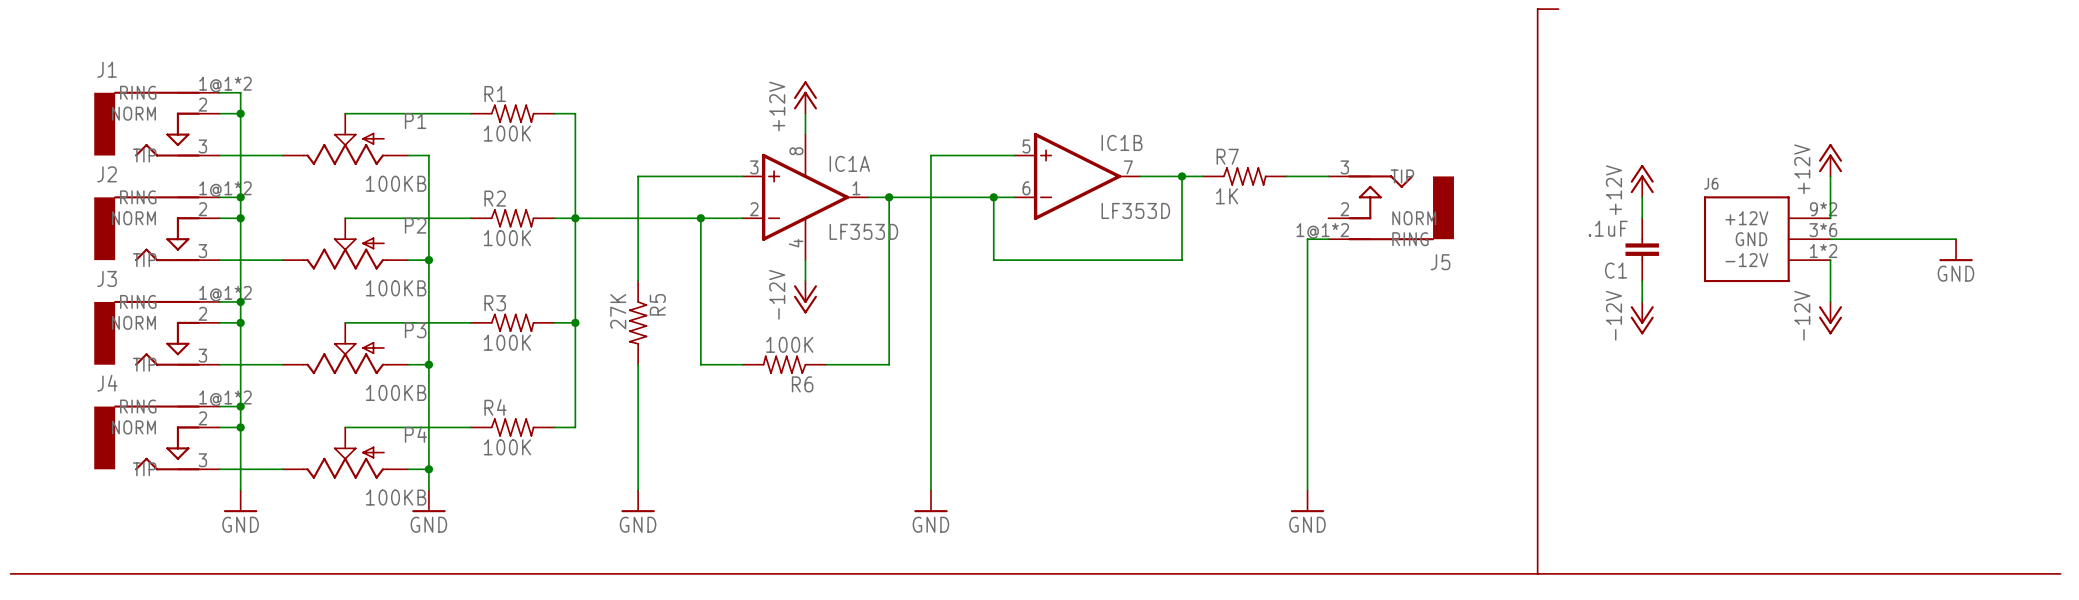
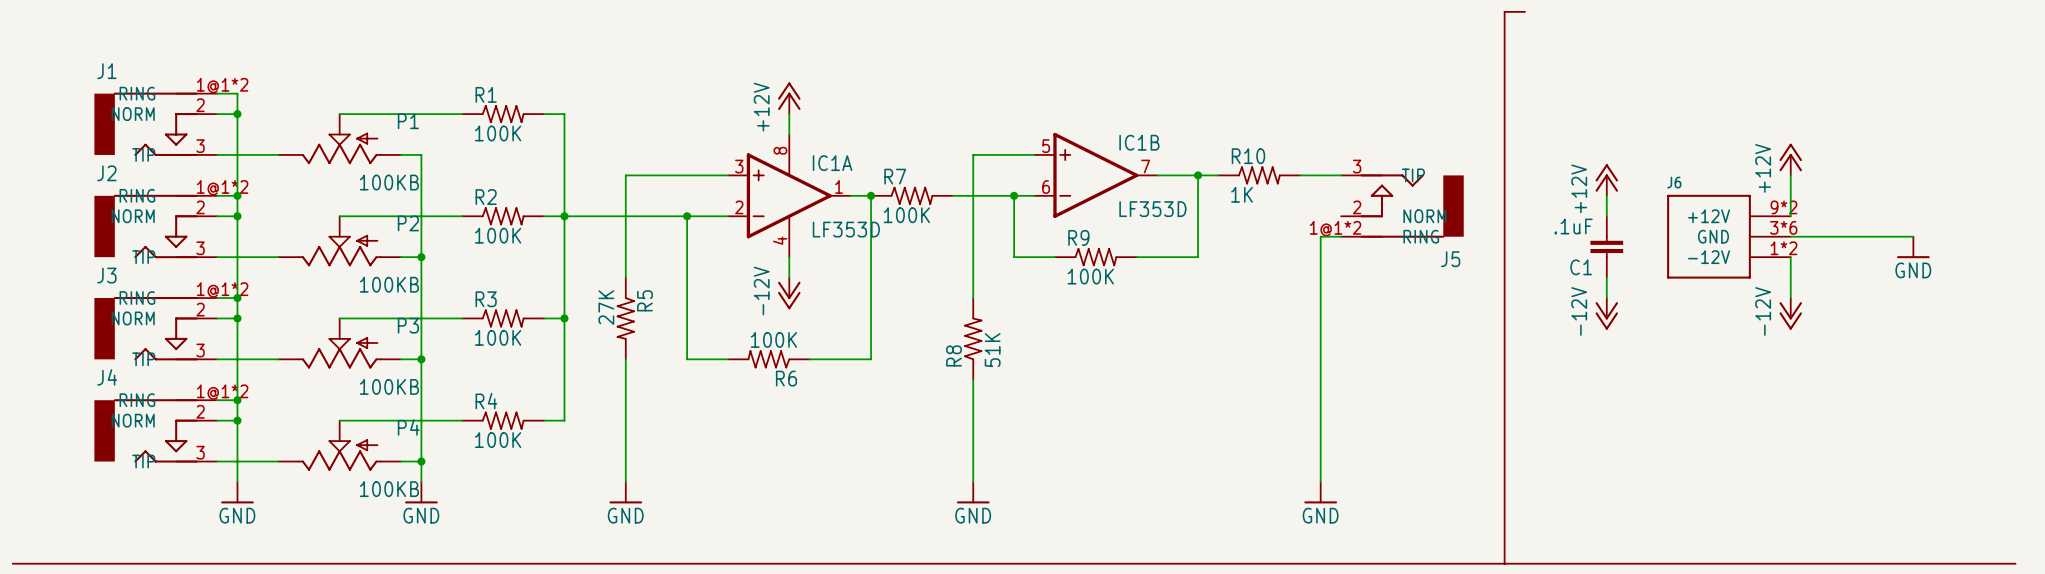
wire: (993, 155) (930, 155) (930, 490) -> (973, 154) (973, 195)
IC1B position: (1077, 176) -> (1095, 175)
wire: (1140, 176) (1182, 176) (1182, 260) -> (1198, 175) (1198, 257) (1157, 257)
junction position: (1182, 176) -> (1198, 175)
R7 position: (1244, 176) -> (911, 195)
R10: none -> 1K (1259, 175)
R7 value: 1K (1227, 196) -> 100K (906, 215)
junction position: (993, 197) -> (1014, 195)
wire: none -> (1014, 195) (1014, 257)
J5 position: (1391, 207) -> (1402, 206)
wire: (1328, 239) (1307, 239) (1307, 490) -> (1341, 236) (1320, 236) (1320, 481)
wire: (993, 260) (1035, 260) -> (973, 257) (973, 298)
R9: none -> 100K (1095, 257)
R8: none -> 51K (973, 338)
wire: none -> (973, 379) (973, 481)
power symbol position: GND (930, 501) -> GND (973, 492)
power symbol position: GND (1307, 501) -> GND (1320, 492)

